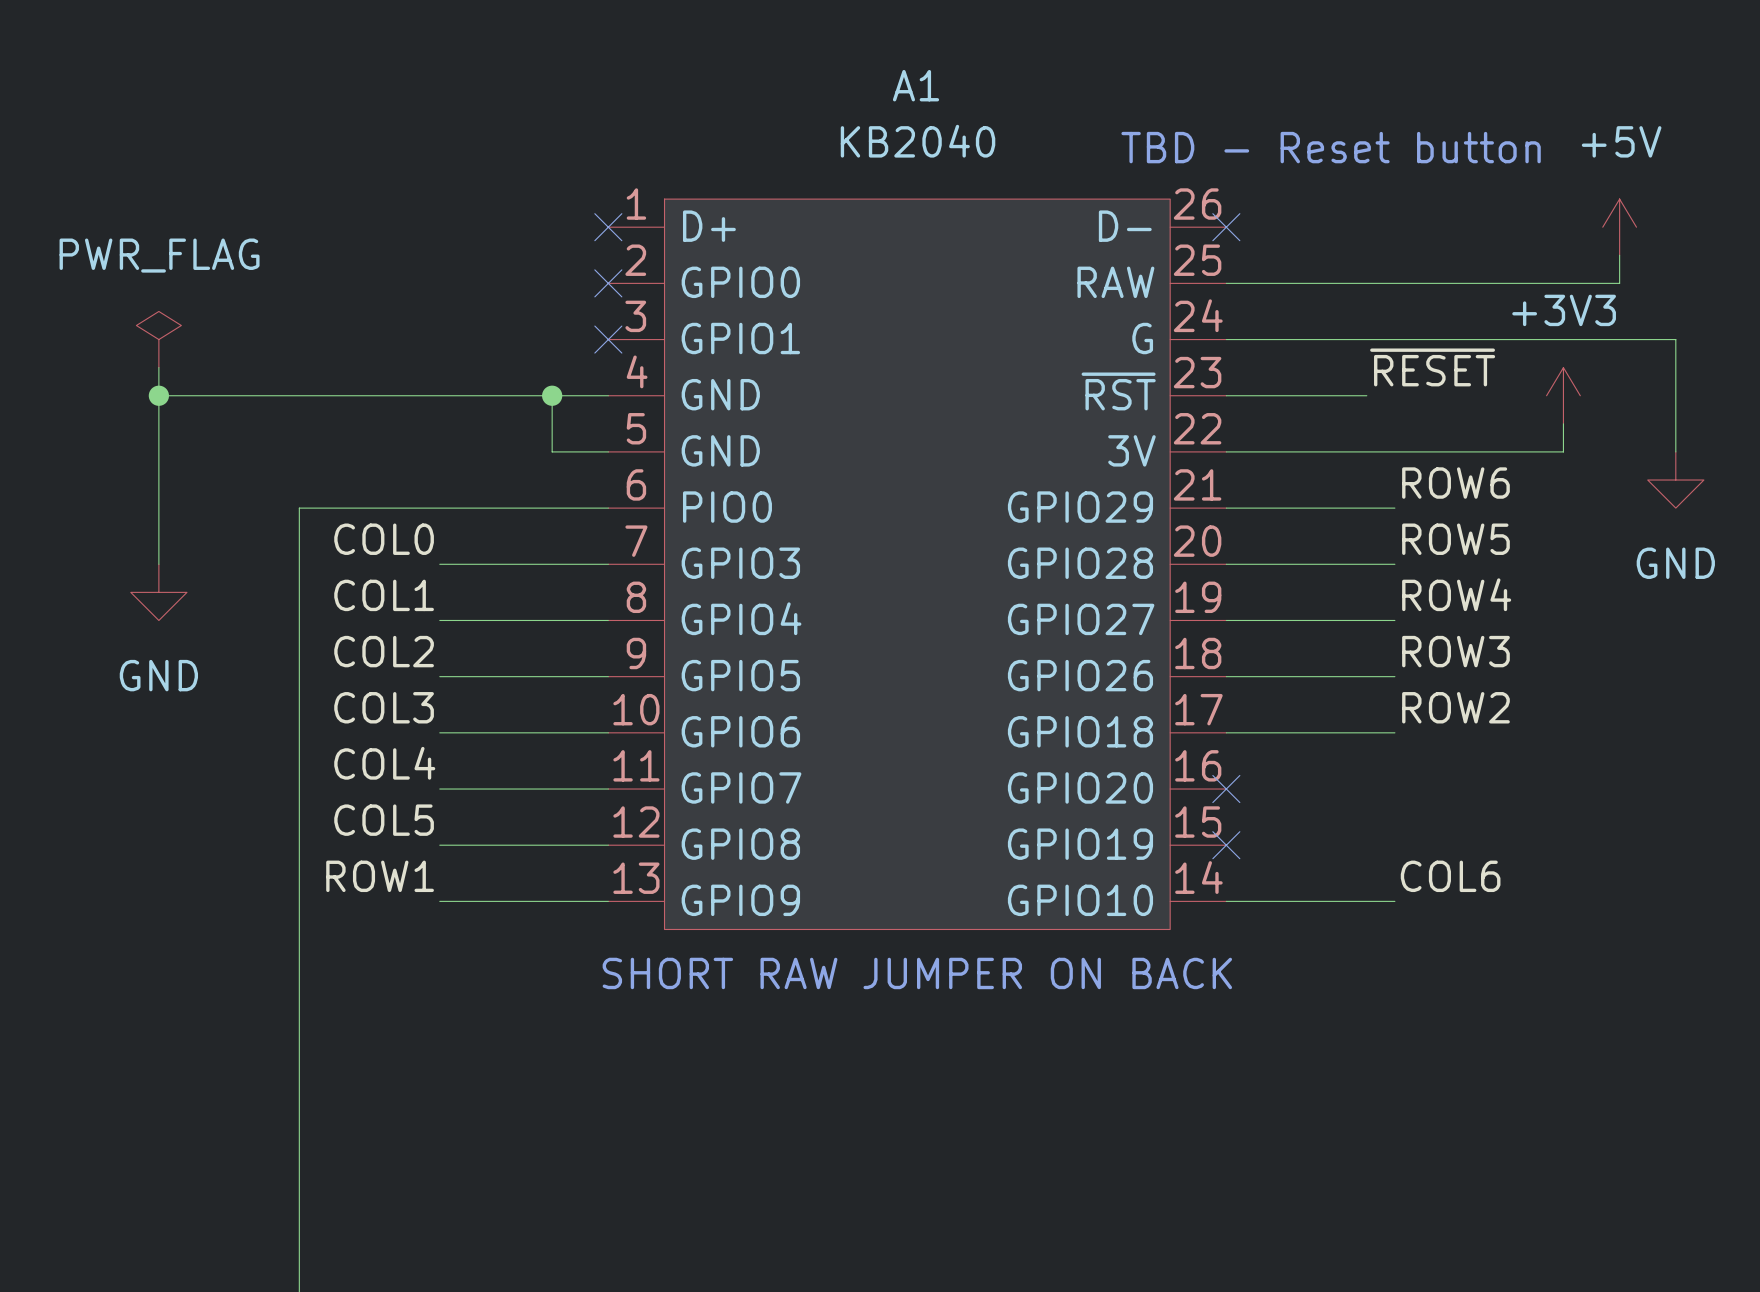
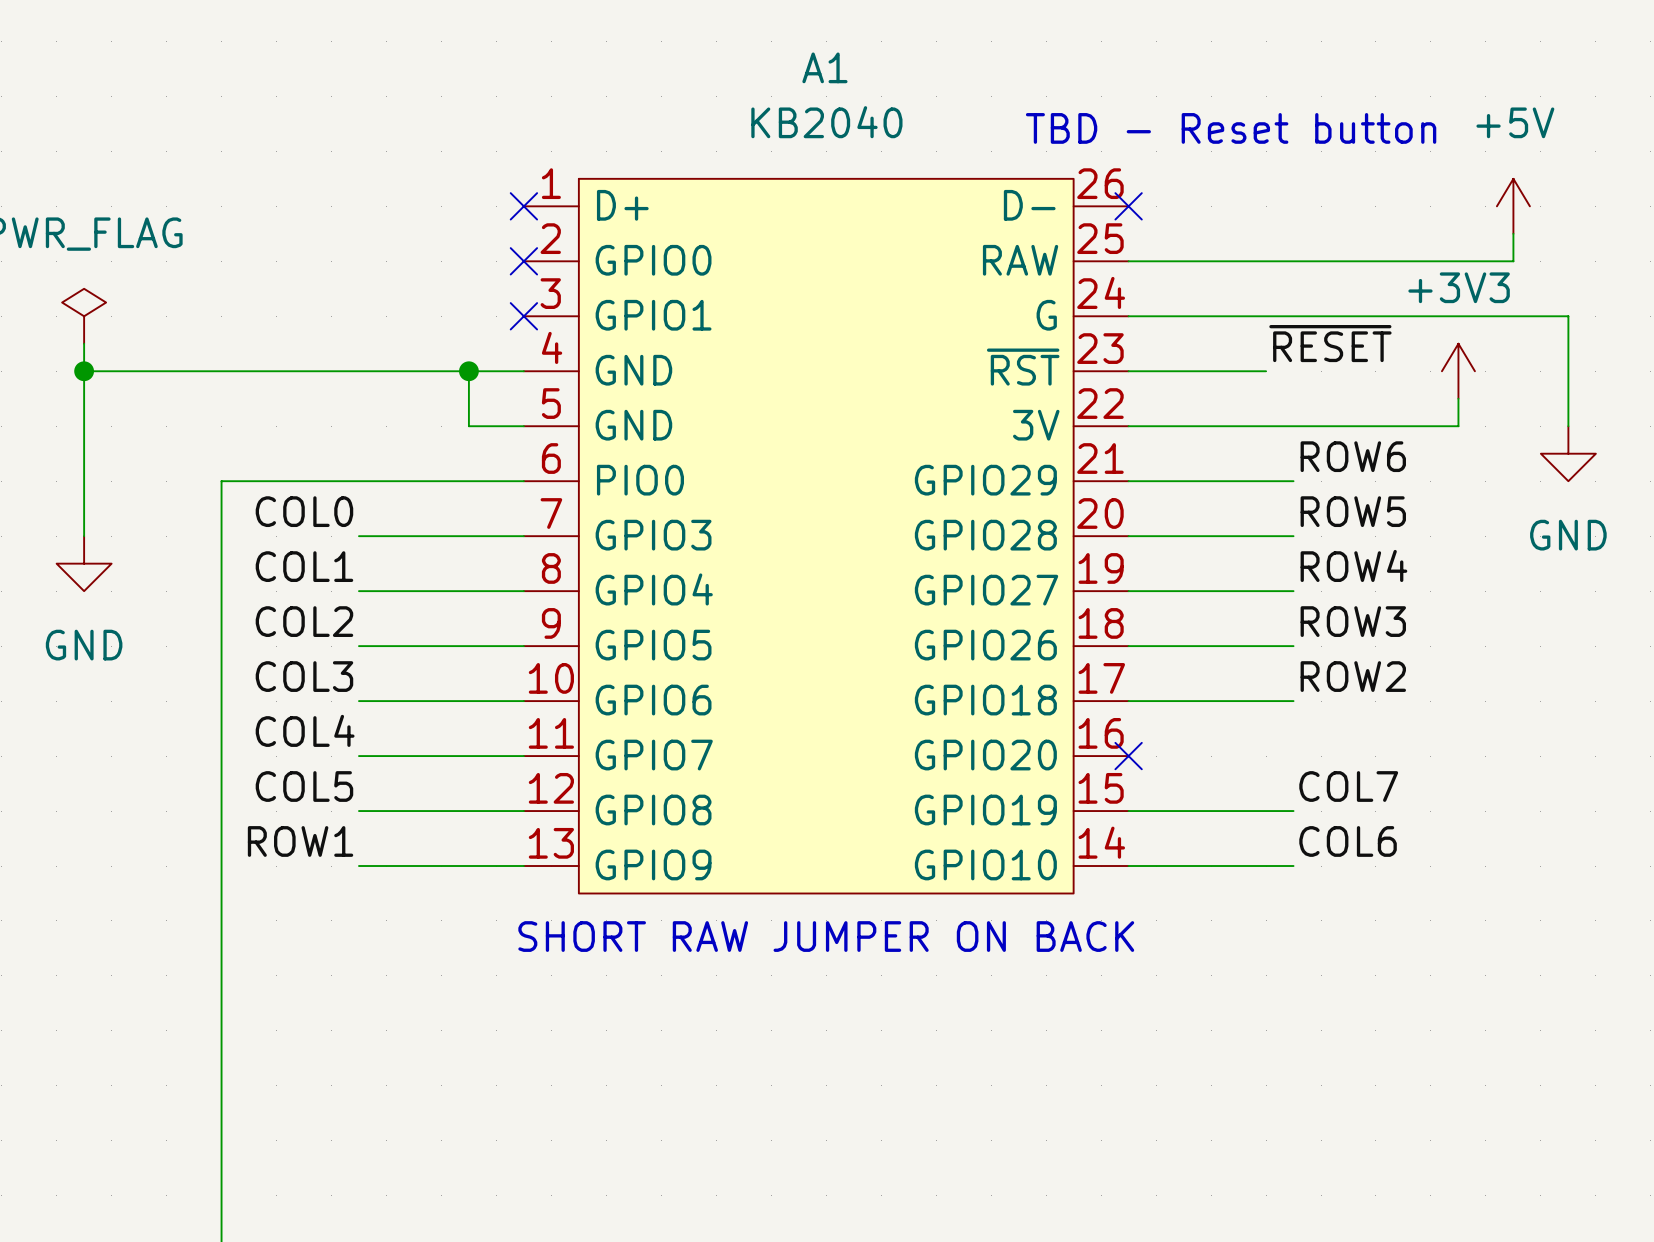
label: none -> COL7 (1348, 786)
wire: none -> (1128, 811) (1293, 811)
no-connect mark: (1226, 845) -> none

